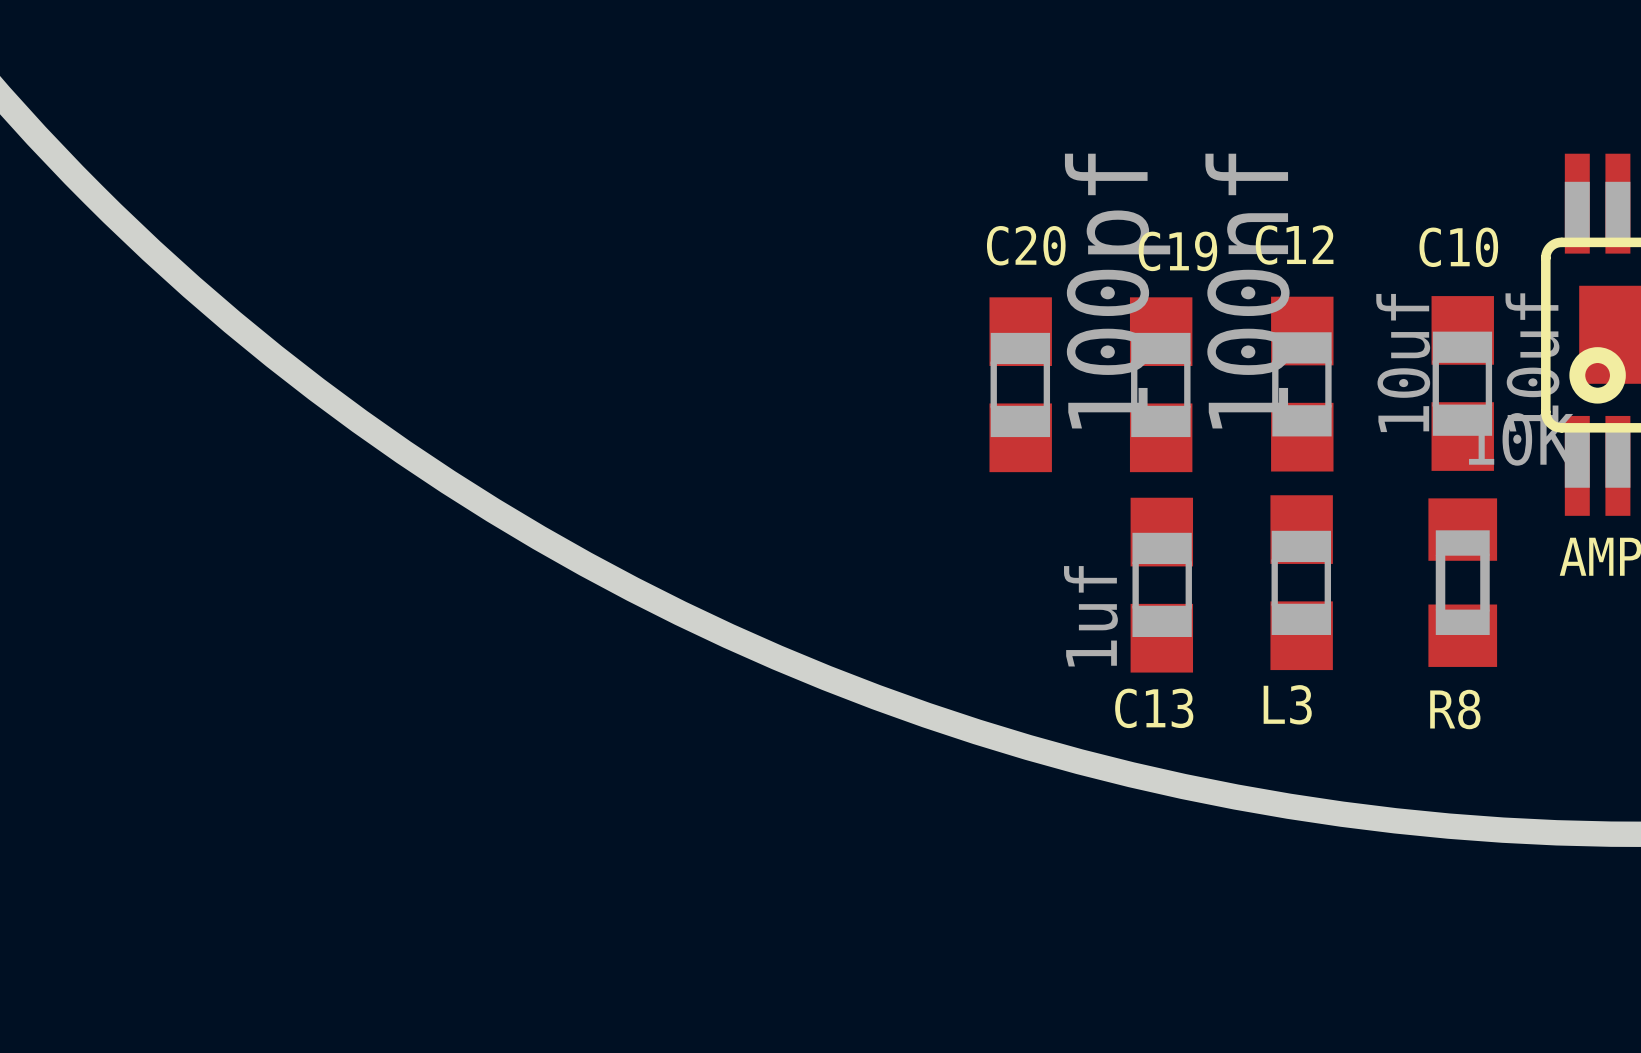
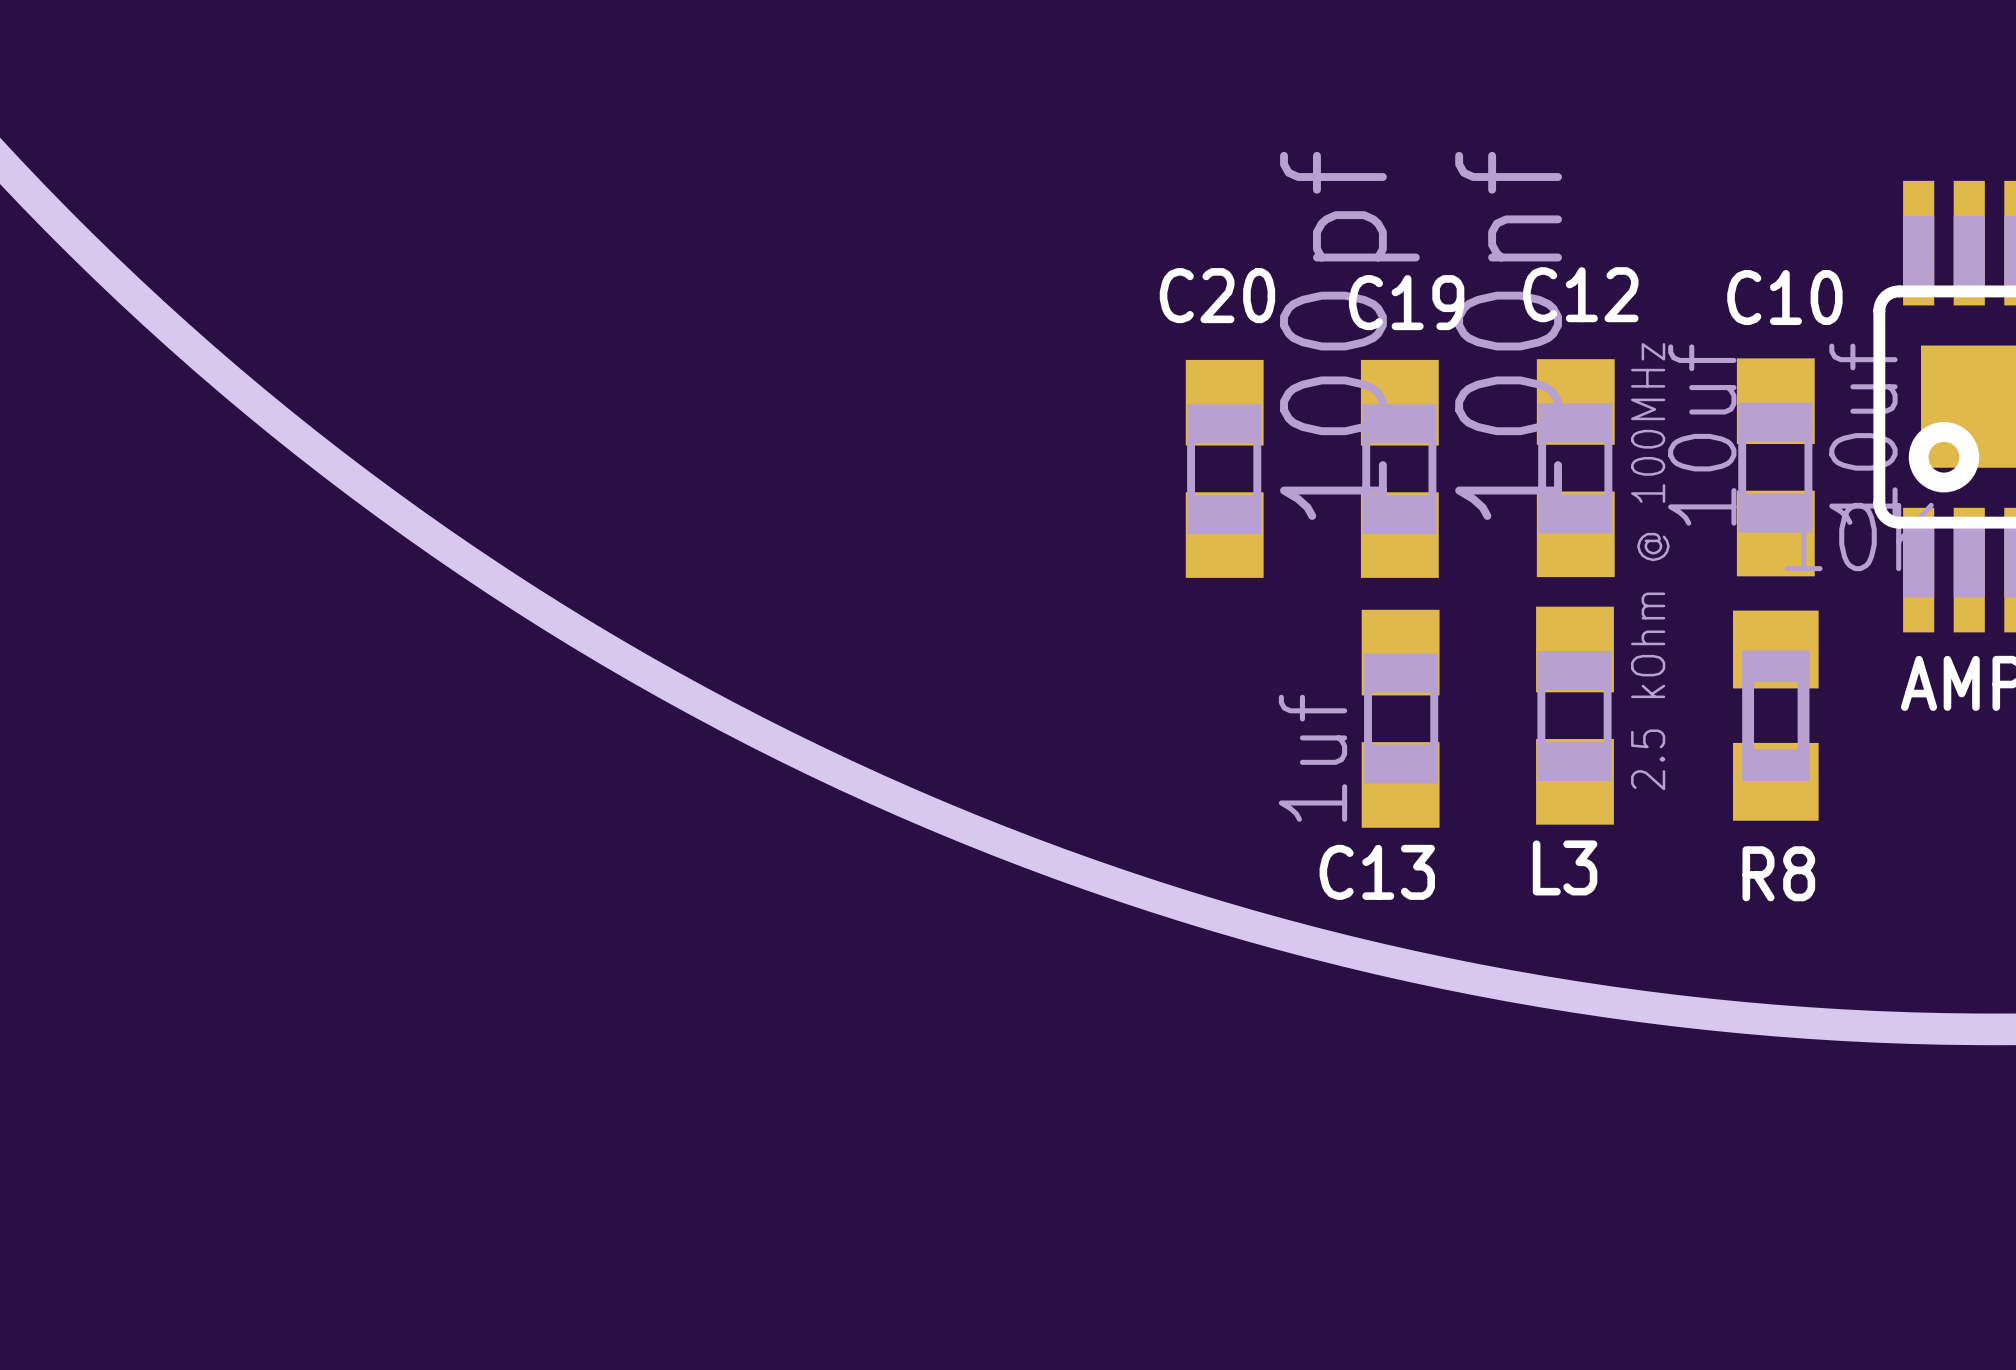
L3 value: none -> 2.5 kOhm @ 100MHz (1650, 566)

